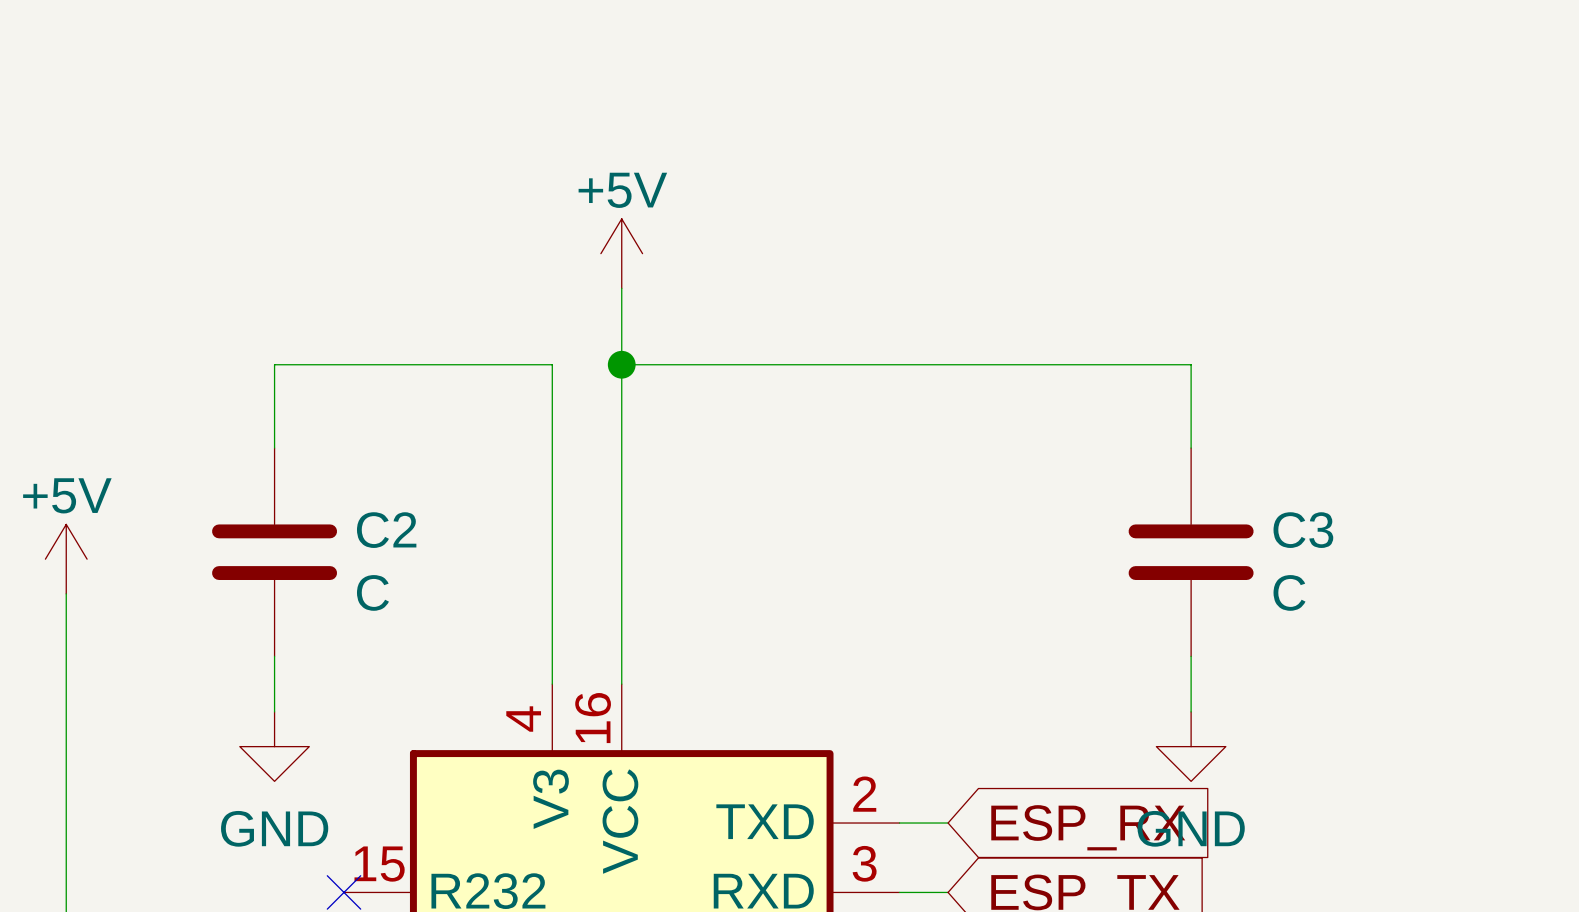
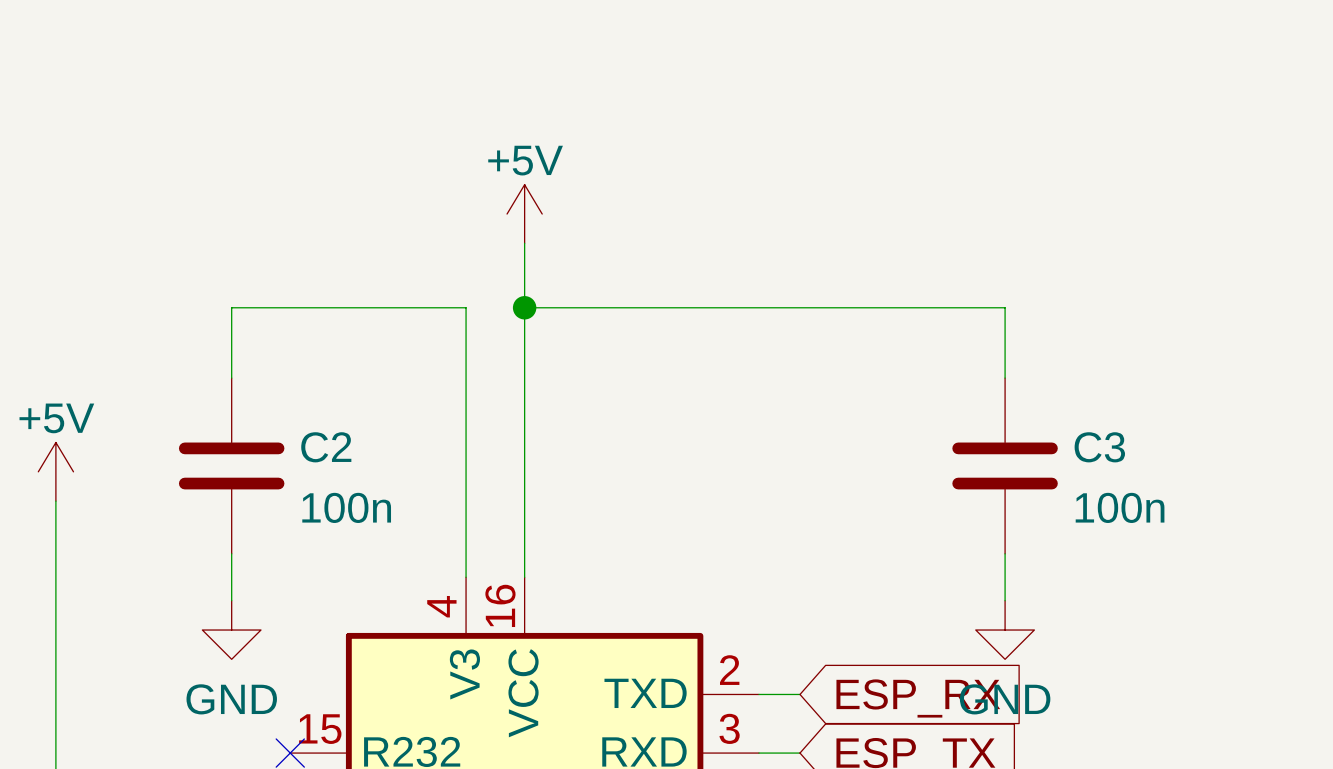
C2 value: C (372, 592) -> 100n (346, 507)
C3 value: C (1289, 592) -> 100n (1120, 507)

